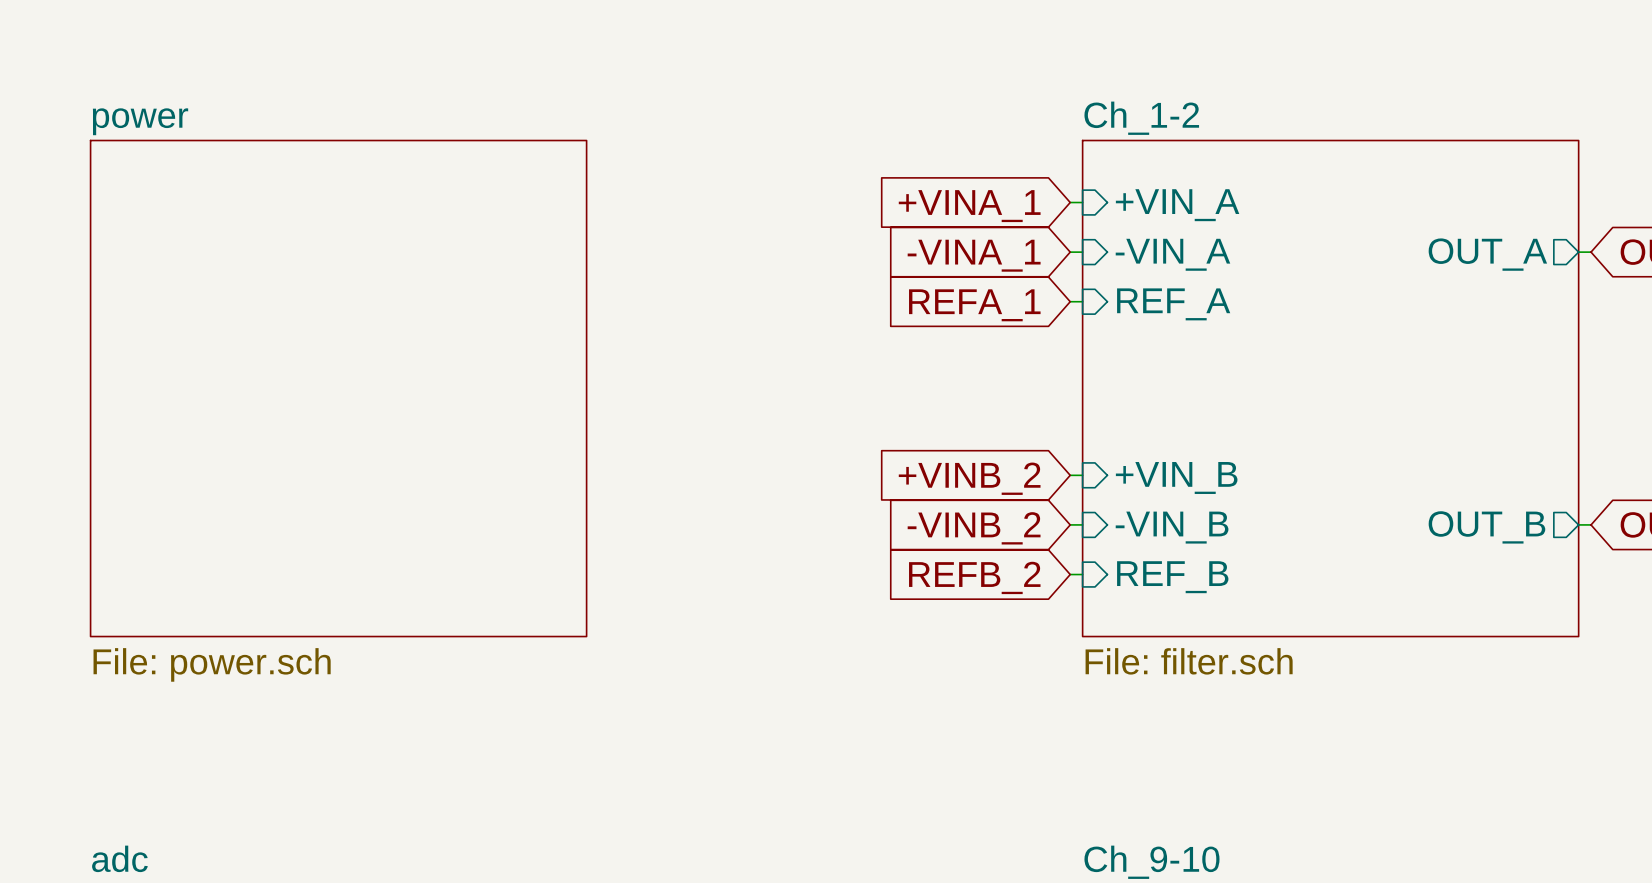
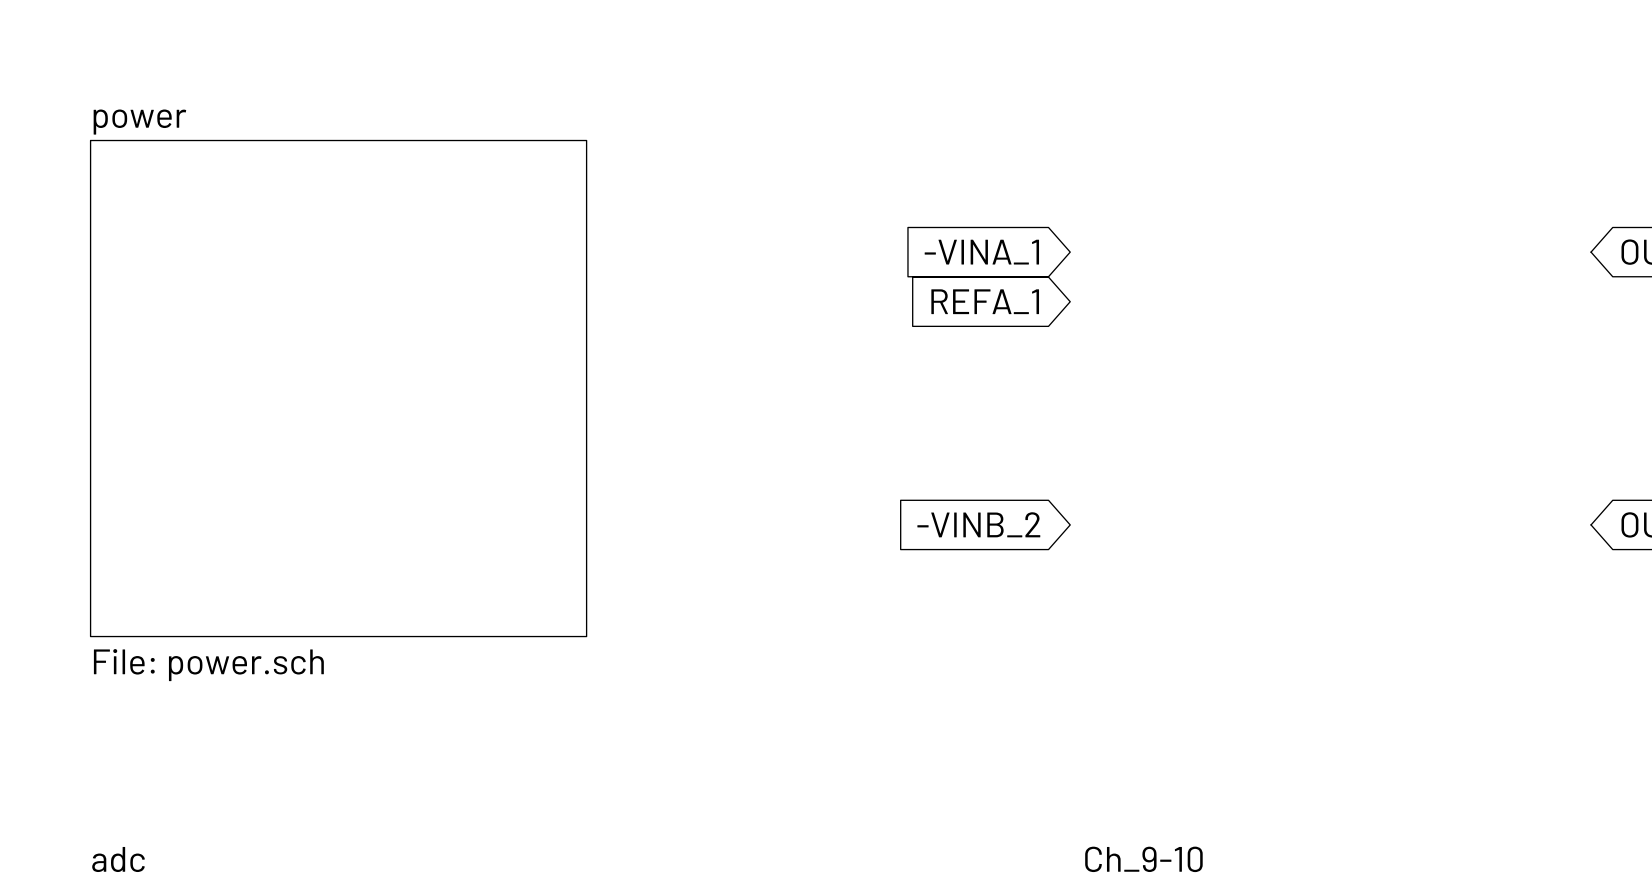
wire: (1070, 202) (1082, 202) -> none
sheet pin: +VIN_A (1177, 205) -> none
global label: +VINA_1 (969, 206) -> none
wire: (1070, 252) (1082, 252) -> none
wire: (1578, 252) (1591, 252) -> none
sheet pin: -VIN_A (1172, 254) -> none
sheet pin: OUT_A (1487, 254) -> none
wire: (1070, 301) (1082, 301) -> none
sheet pin: REF_A (1173, 304) -> none
sheet Ch_1-2: File: filter.sch (1330, 388) -> none
wire: (1070, 475) (1082, 475) -> none
sheet pin: +VIN_B (1176, 477) -> none
global label: +VINB_2 (969, 478) -> none
wire: (1070, 524) (1082, 524) -> none
wire: (1578, 524) (1591, 524) -> none
sheet pin: -VIN_B (1172, 527) -> none
sheet pin: OUT_B (1486, 527) -> none
wire: (1070, 574) (1082, 574) -> none
global label: REFB_2 (974, 577) -> none
sheet pin: REF_B (1172, 577) -> none

